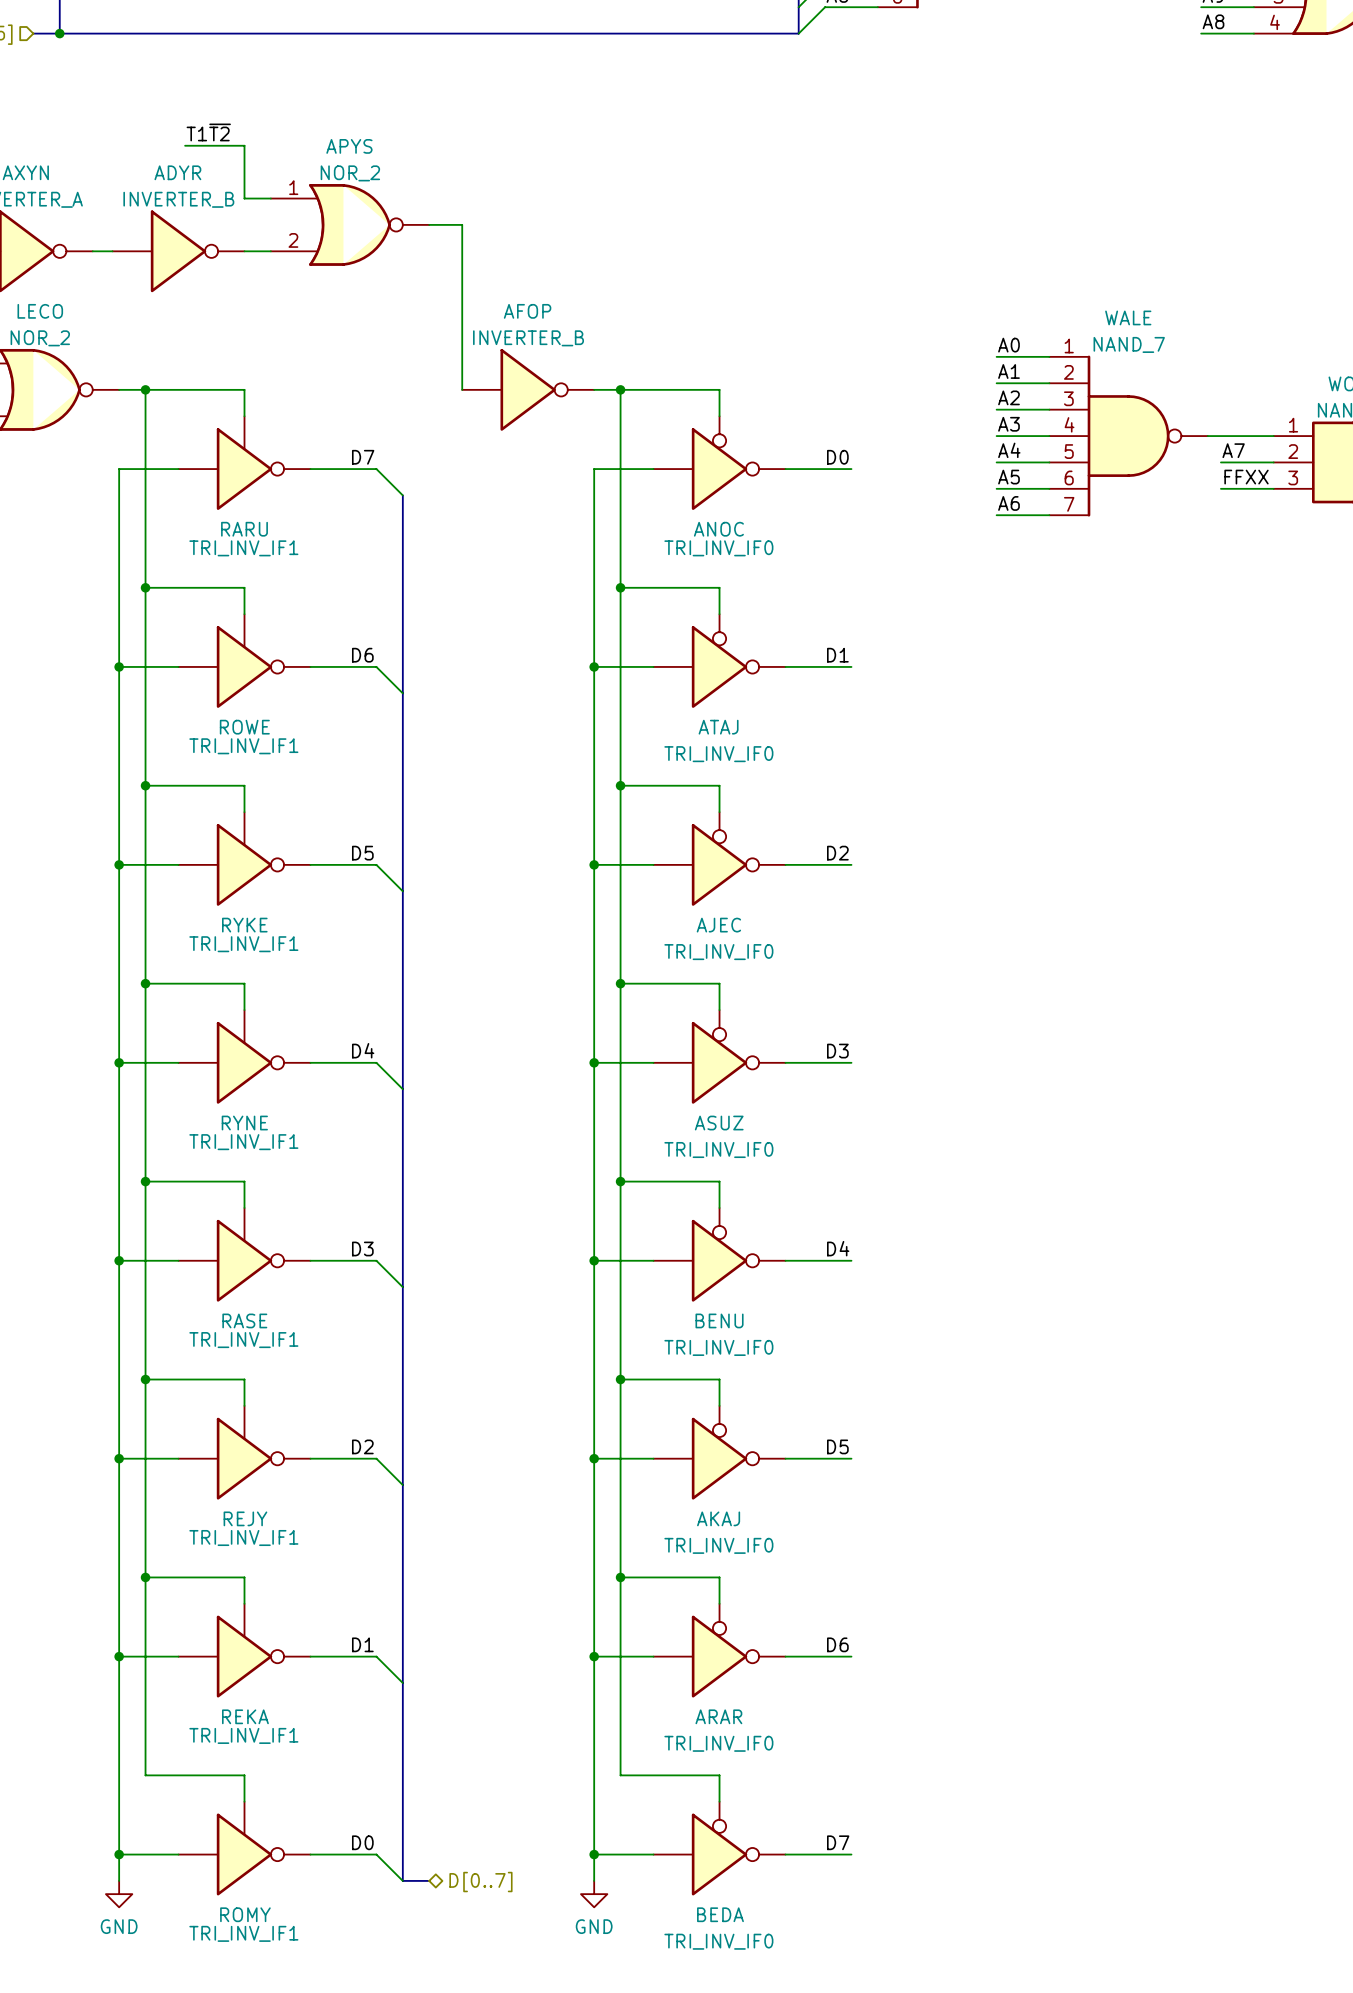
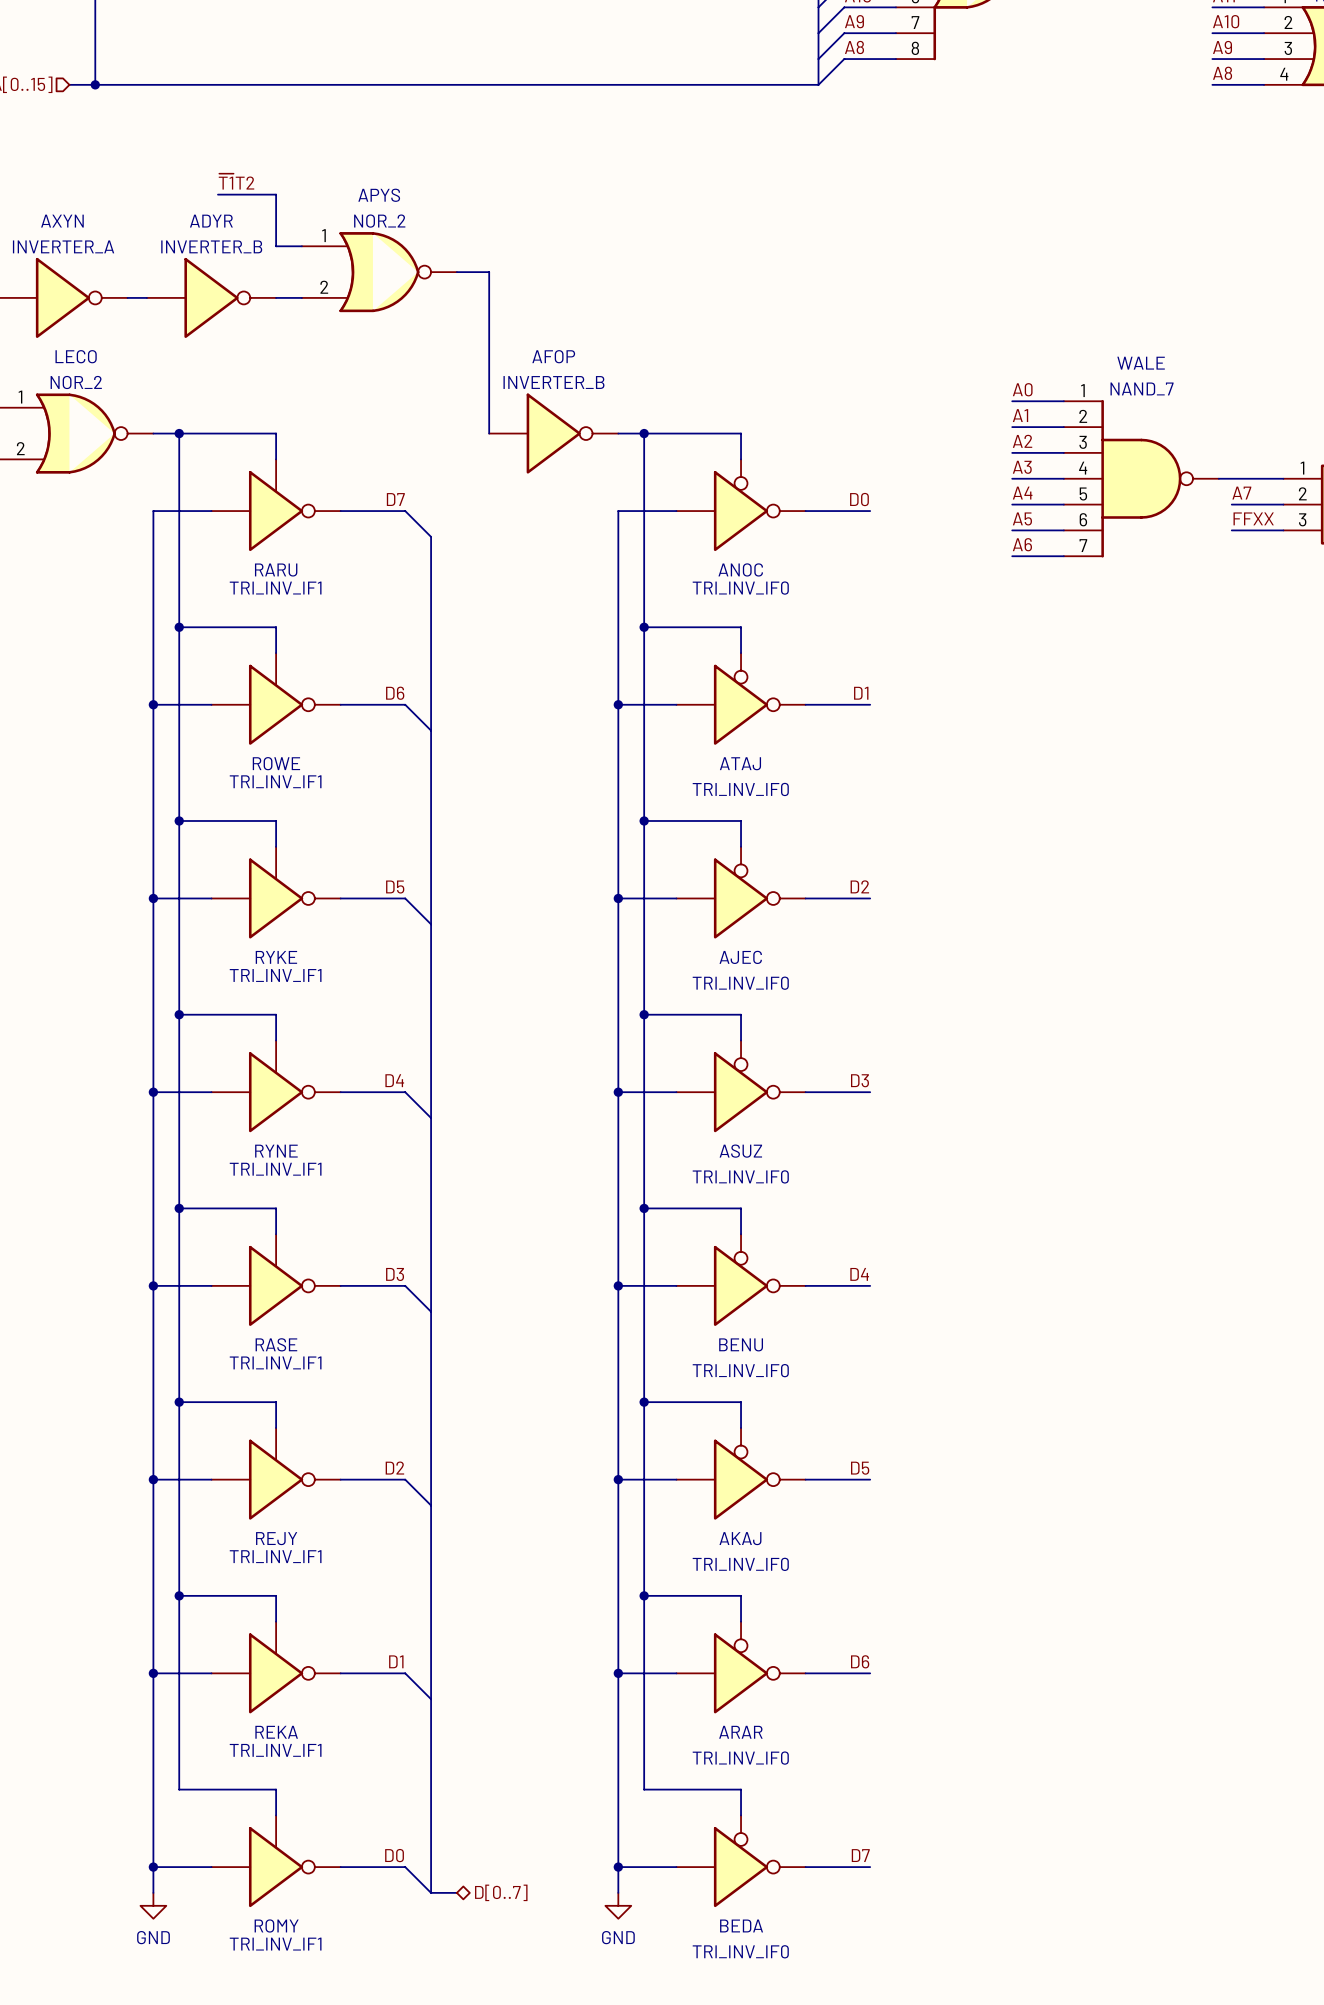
label: T1~{T2} (208, 132) -> ~{T1}T2 (236, 181)

